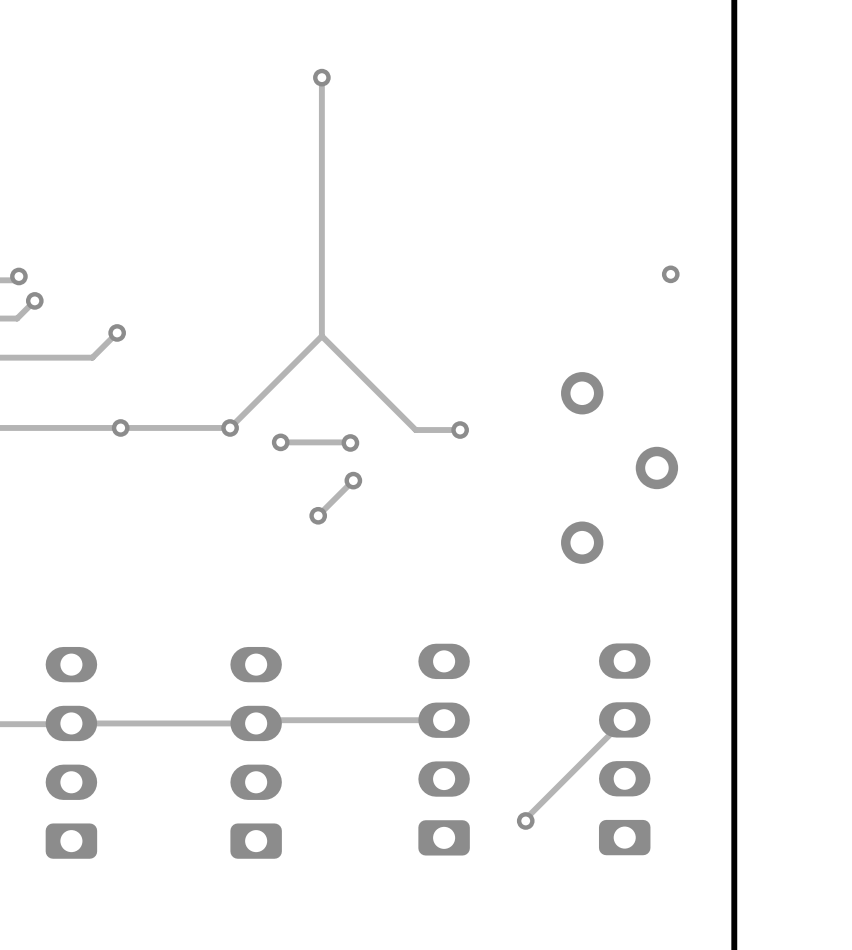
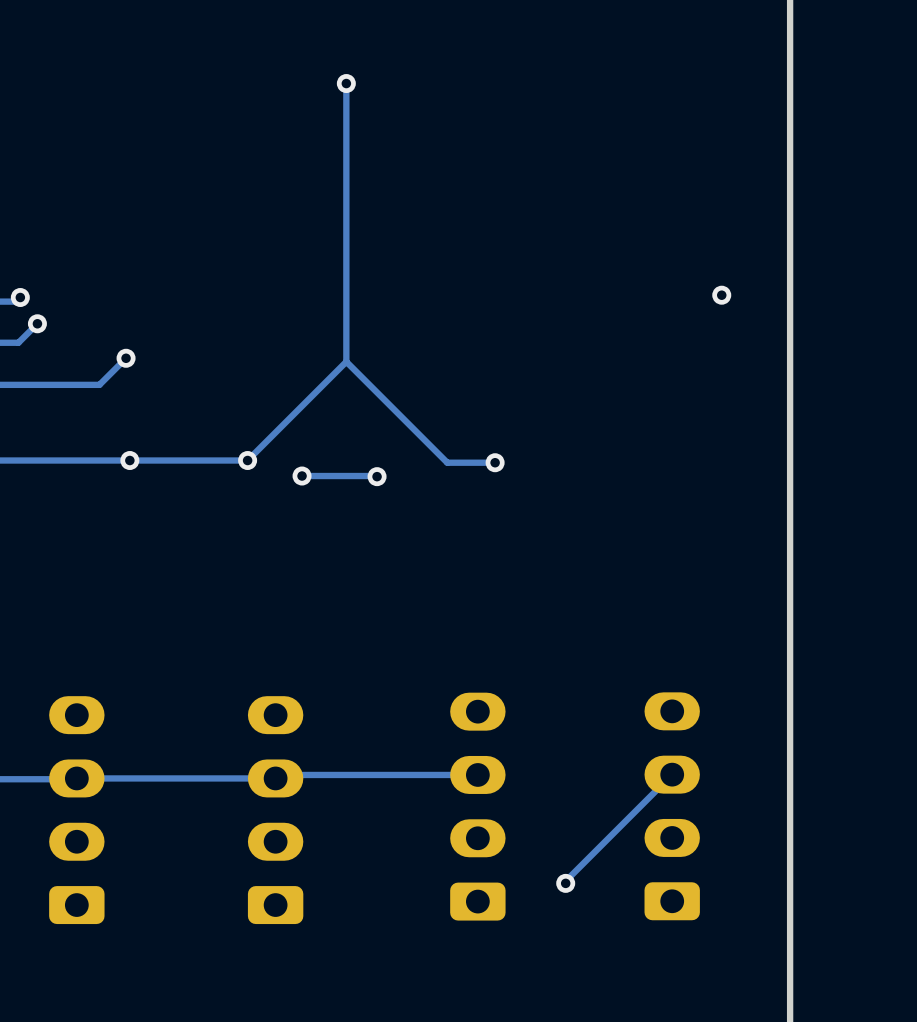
part: (619, 467) -> none
track: (353, 480) (318, 515) -> none
via: (353, 480) -> none
via: (318, 515) -> none

